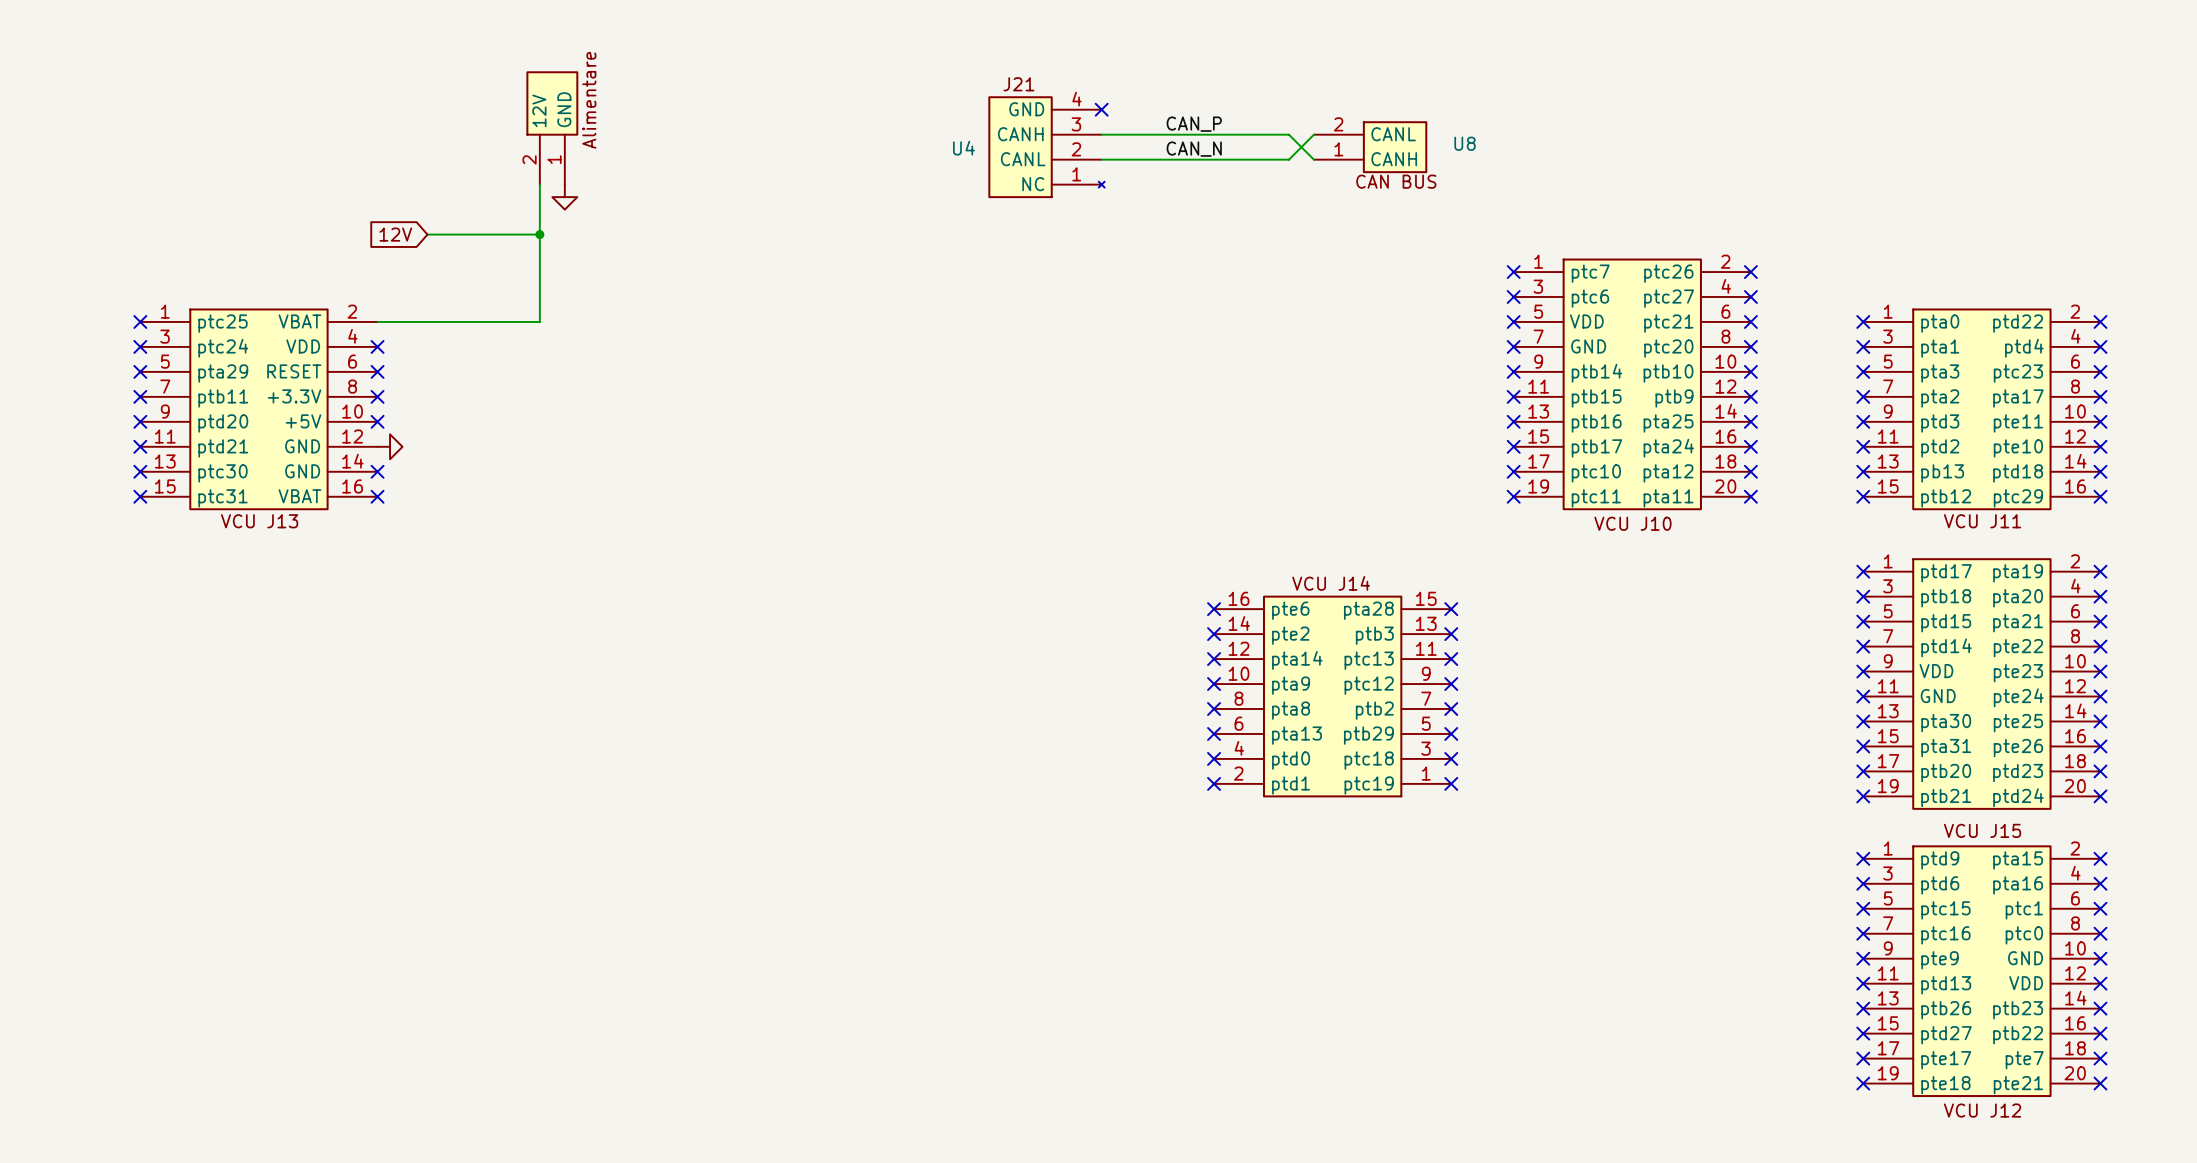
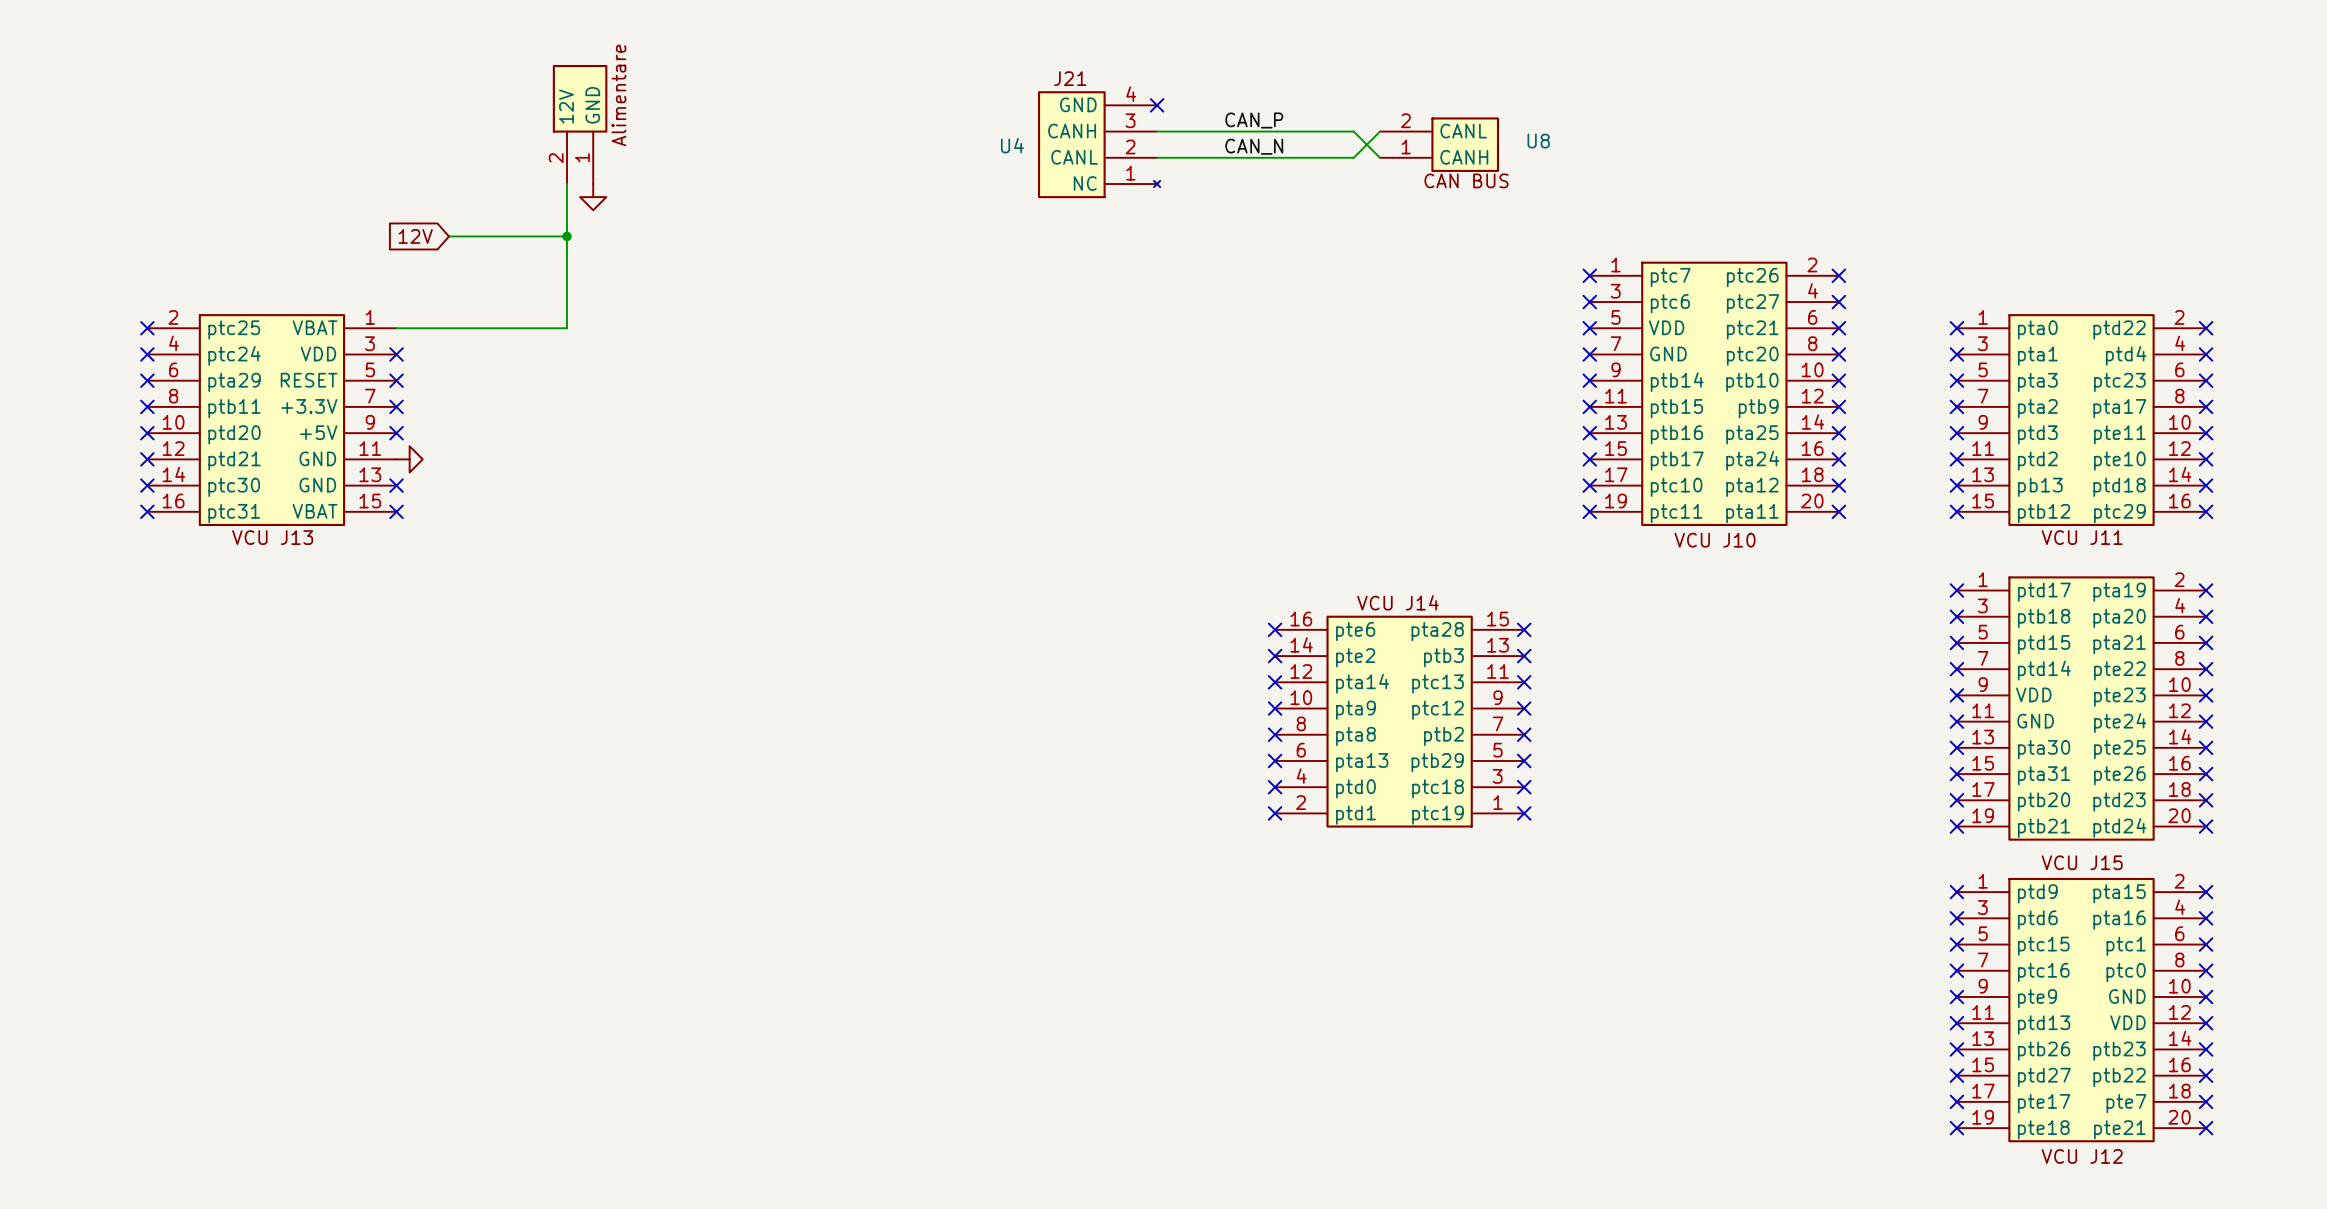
part symbol: [140, 308, 378, 511] -> [147, 314, 397, 526]

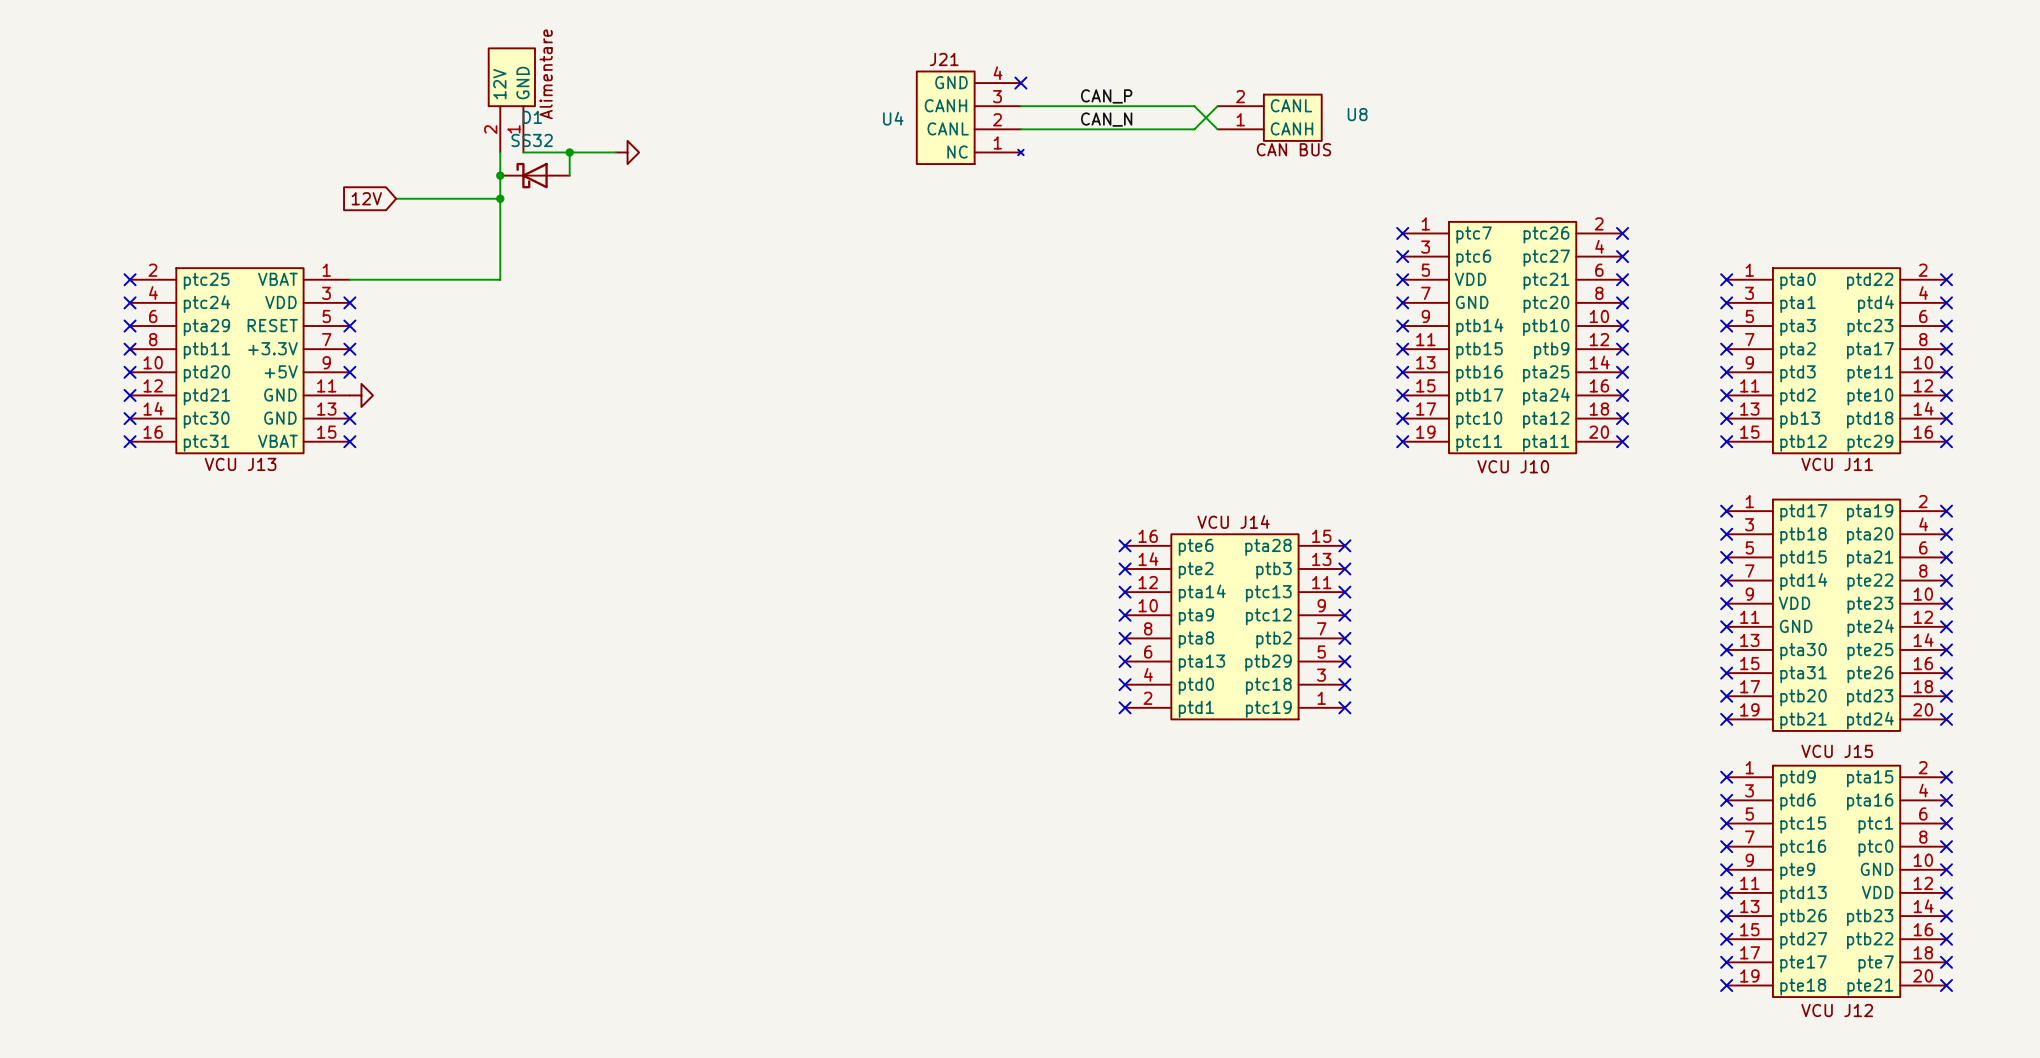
wire: none -> (523, 152) (615, 152)
wire: none -> (569, 152) (569, 175)
junction: none -> (569, 152)
power symbol rotation: 0° (593, 197) -> 90° counterclockwise (627, 152)
power symbol position: (593, 197) -> (627, 152)
junction: none -> (500, 175)
D1: none -> SS32 (534, 175)

